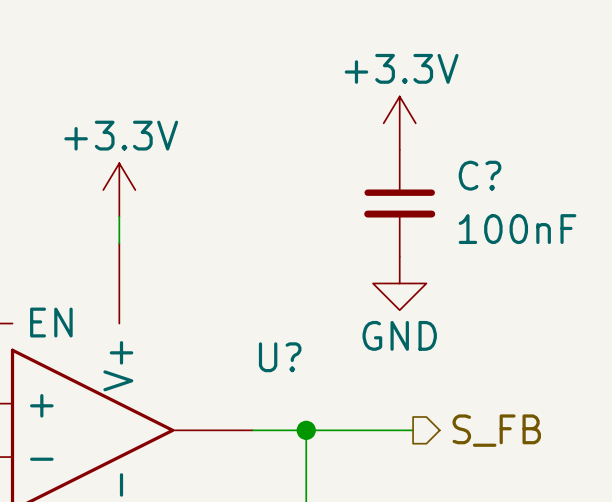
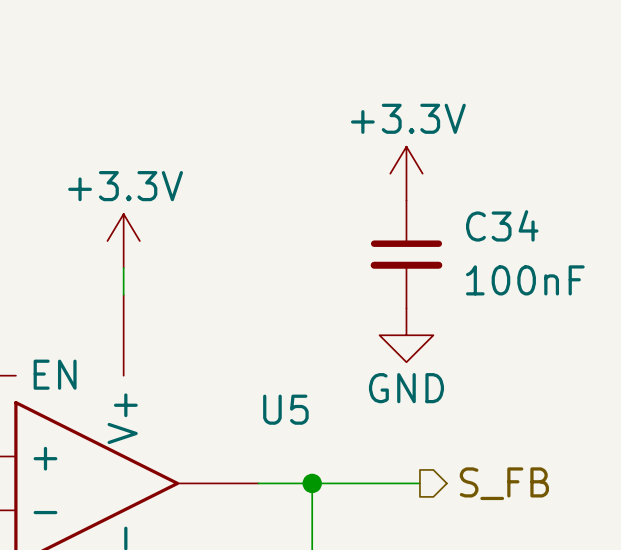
C? name: C? (480, 175) -> C34 (502, 225)
U? name: U? (280, 357) -> U5 (285, 409)

